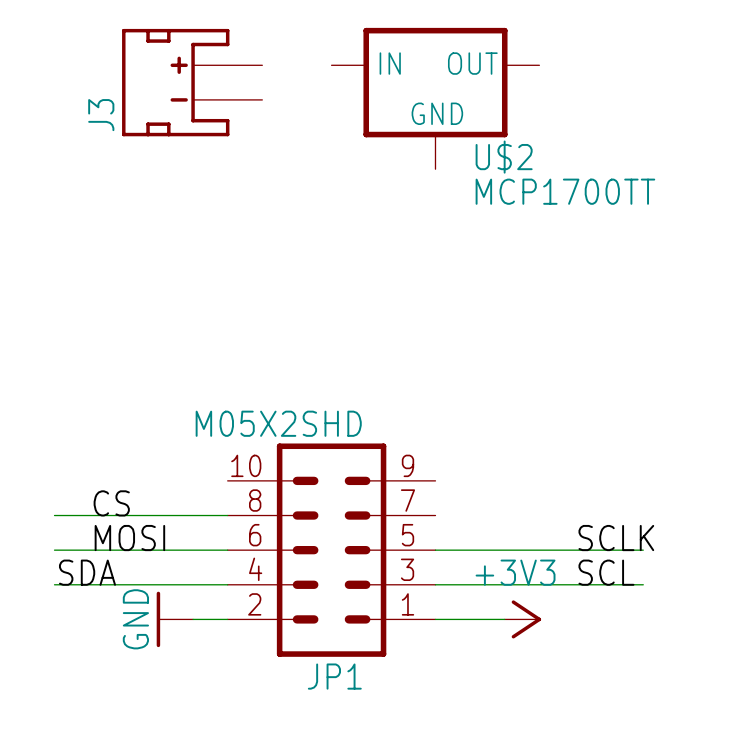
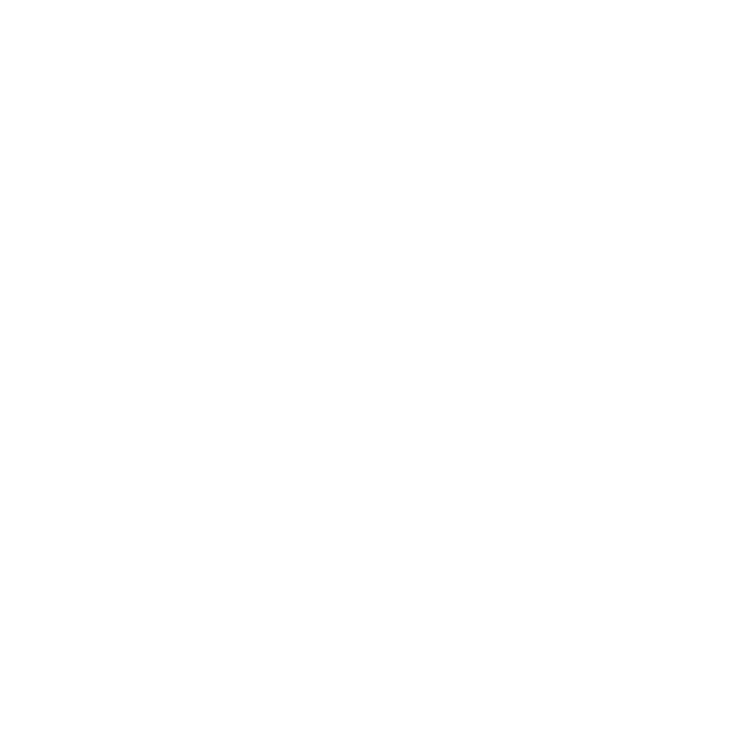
J3: (192, 82) -> none
U$2: MCP1700TT (435, 98) -> none
label: CS (111, 503) -> none
wire: (54, 515) (227, 515) -> none
label: MOSI (129, 538) -> none
label: SCLK (616, 538) -> none
wire: (54, 550) (227, 550) -> none
JP1: M05X2SHD (331, 550) -> none
wire: (435, 550) (643, 550) -> none
label: SDA (87, 572) -> none
label: SCL (606, 572) -> none
wire: (54, 584) (227, 584) -> none
wire: (435, 584) (643, 584) -> none
power symbol: GND (174, 619) -> none
wire: (193, 619) (227, 619) -> none
wire: (435, 619) (504, 619) -> none
power symbol: +3V3 (522, 619) -> none

